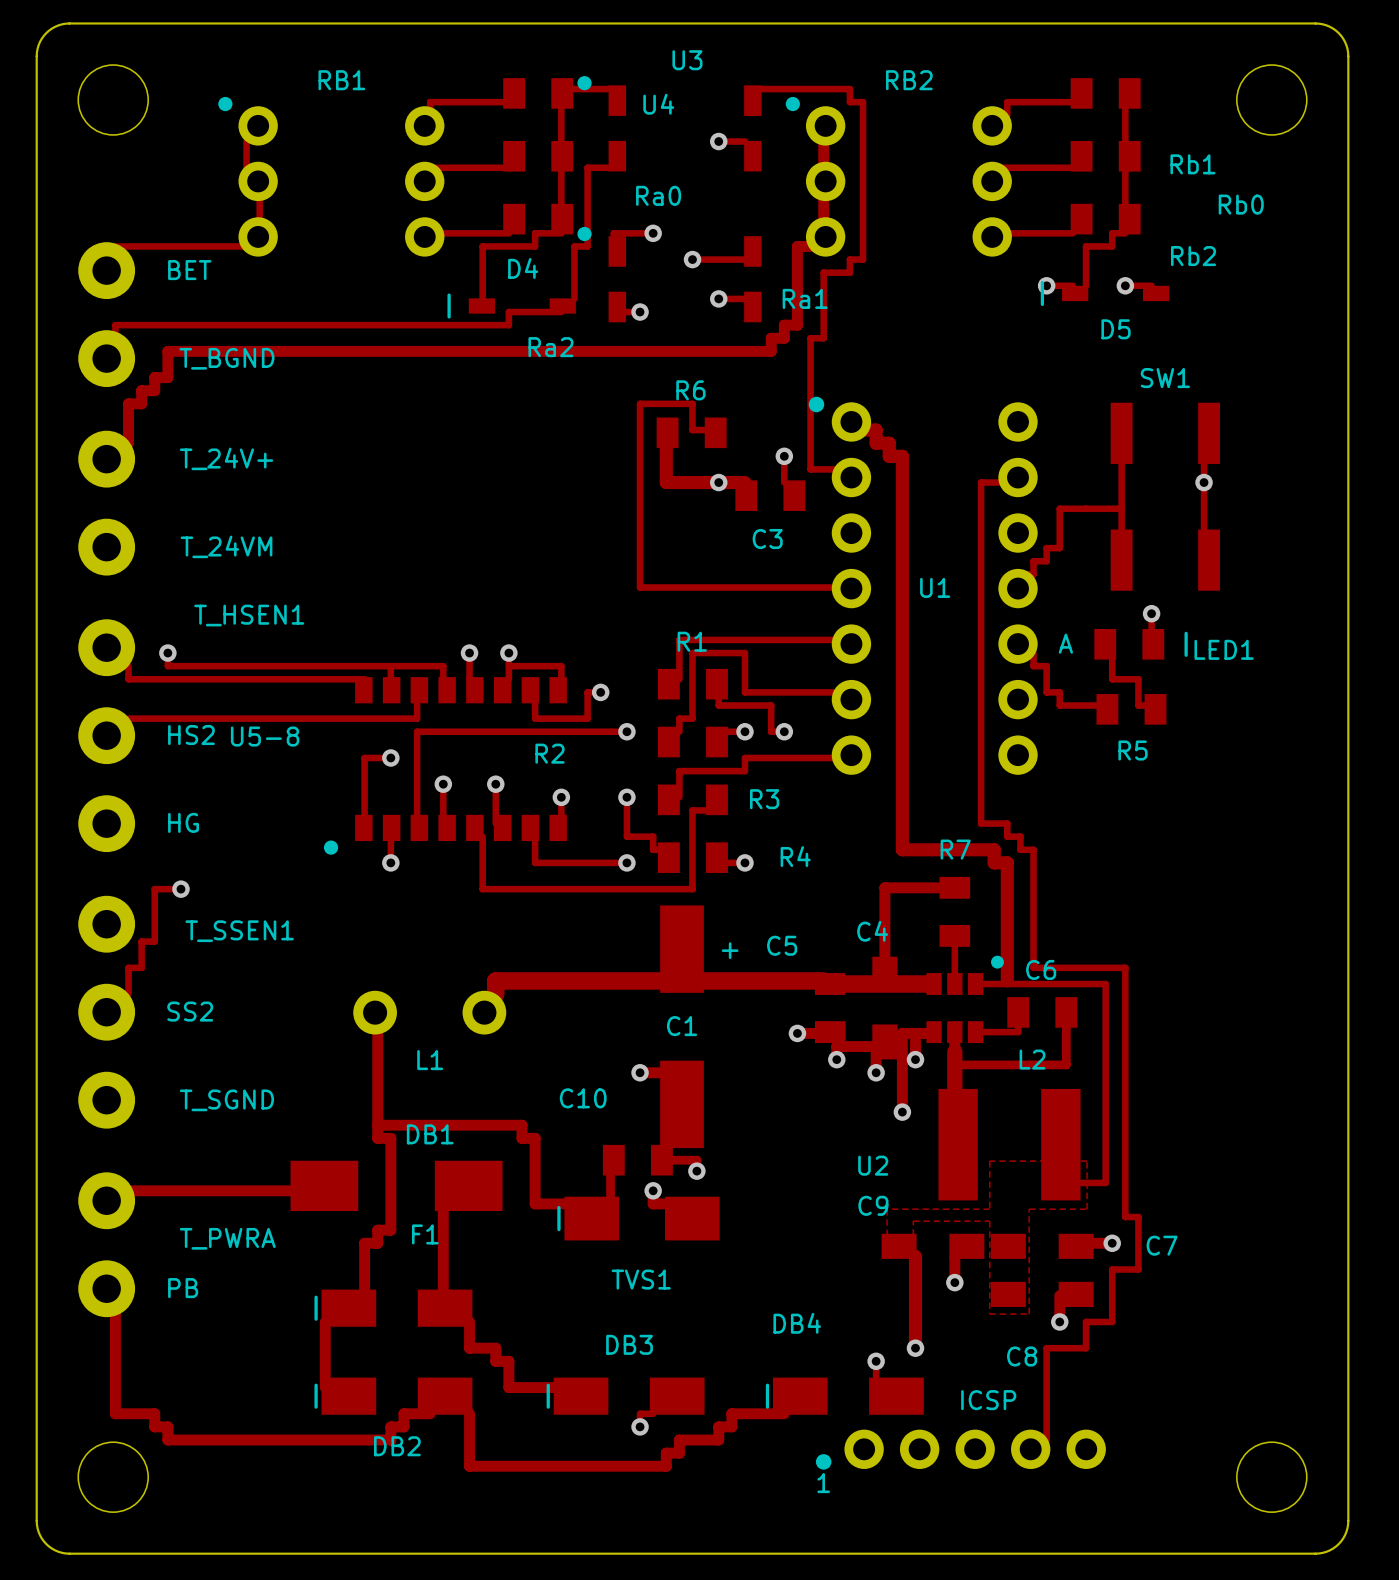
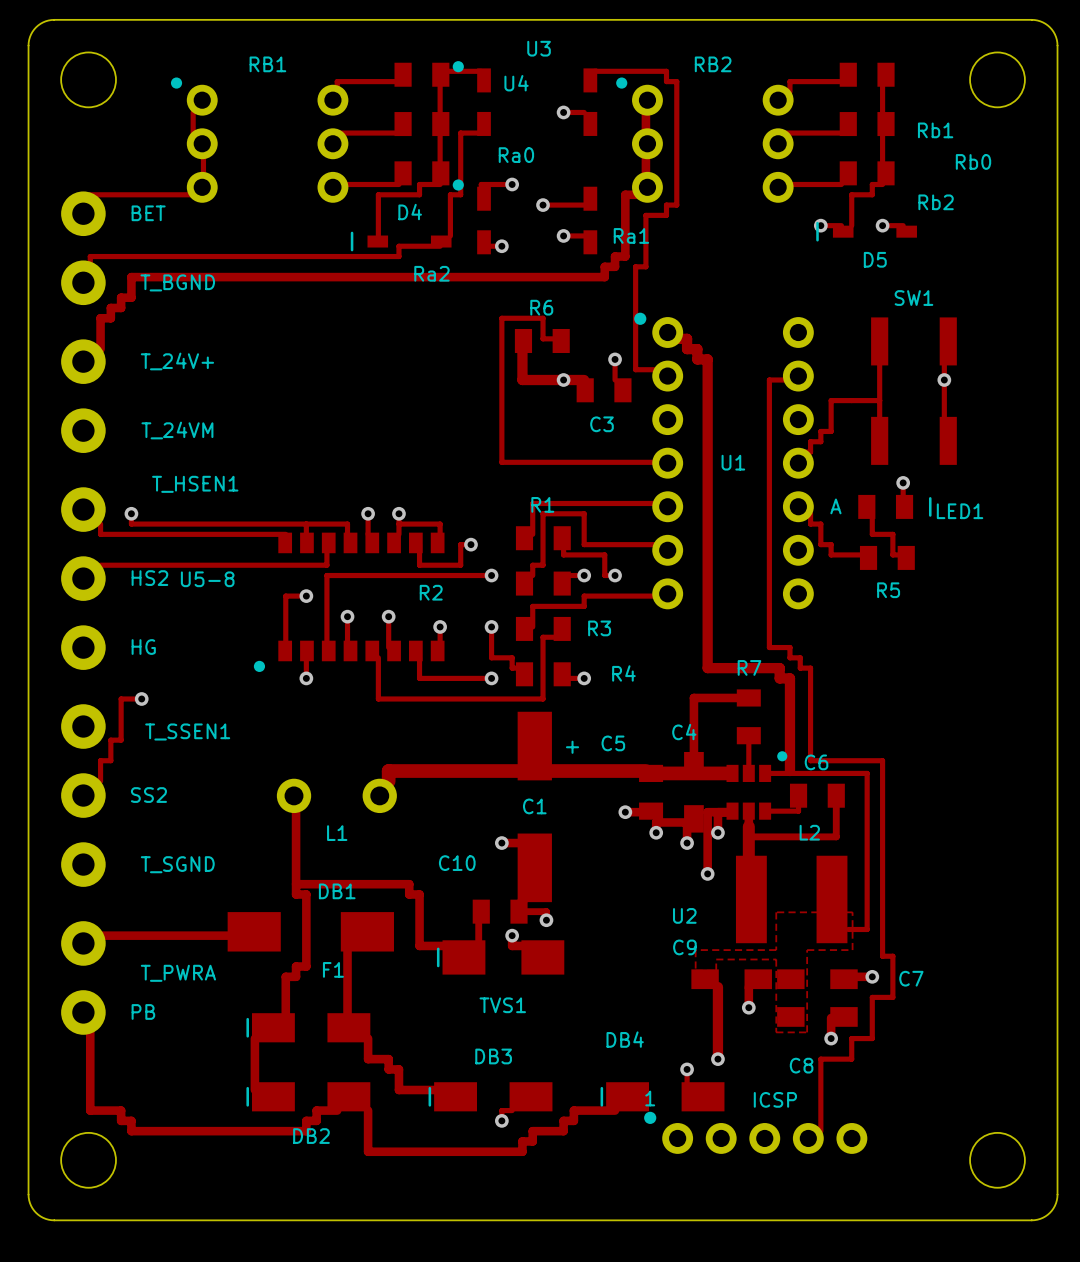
drawing position: (823, 1461) -> (650, 1117)
text position: 1 (823, 1483) -> 1 (650, 1098)

